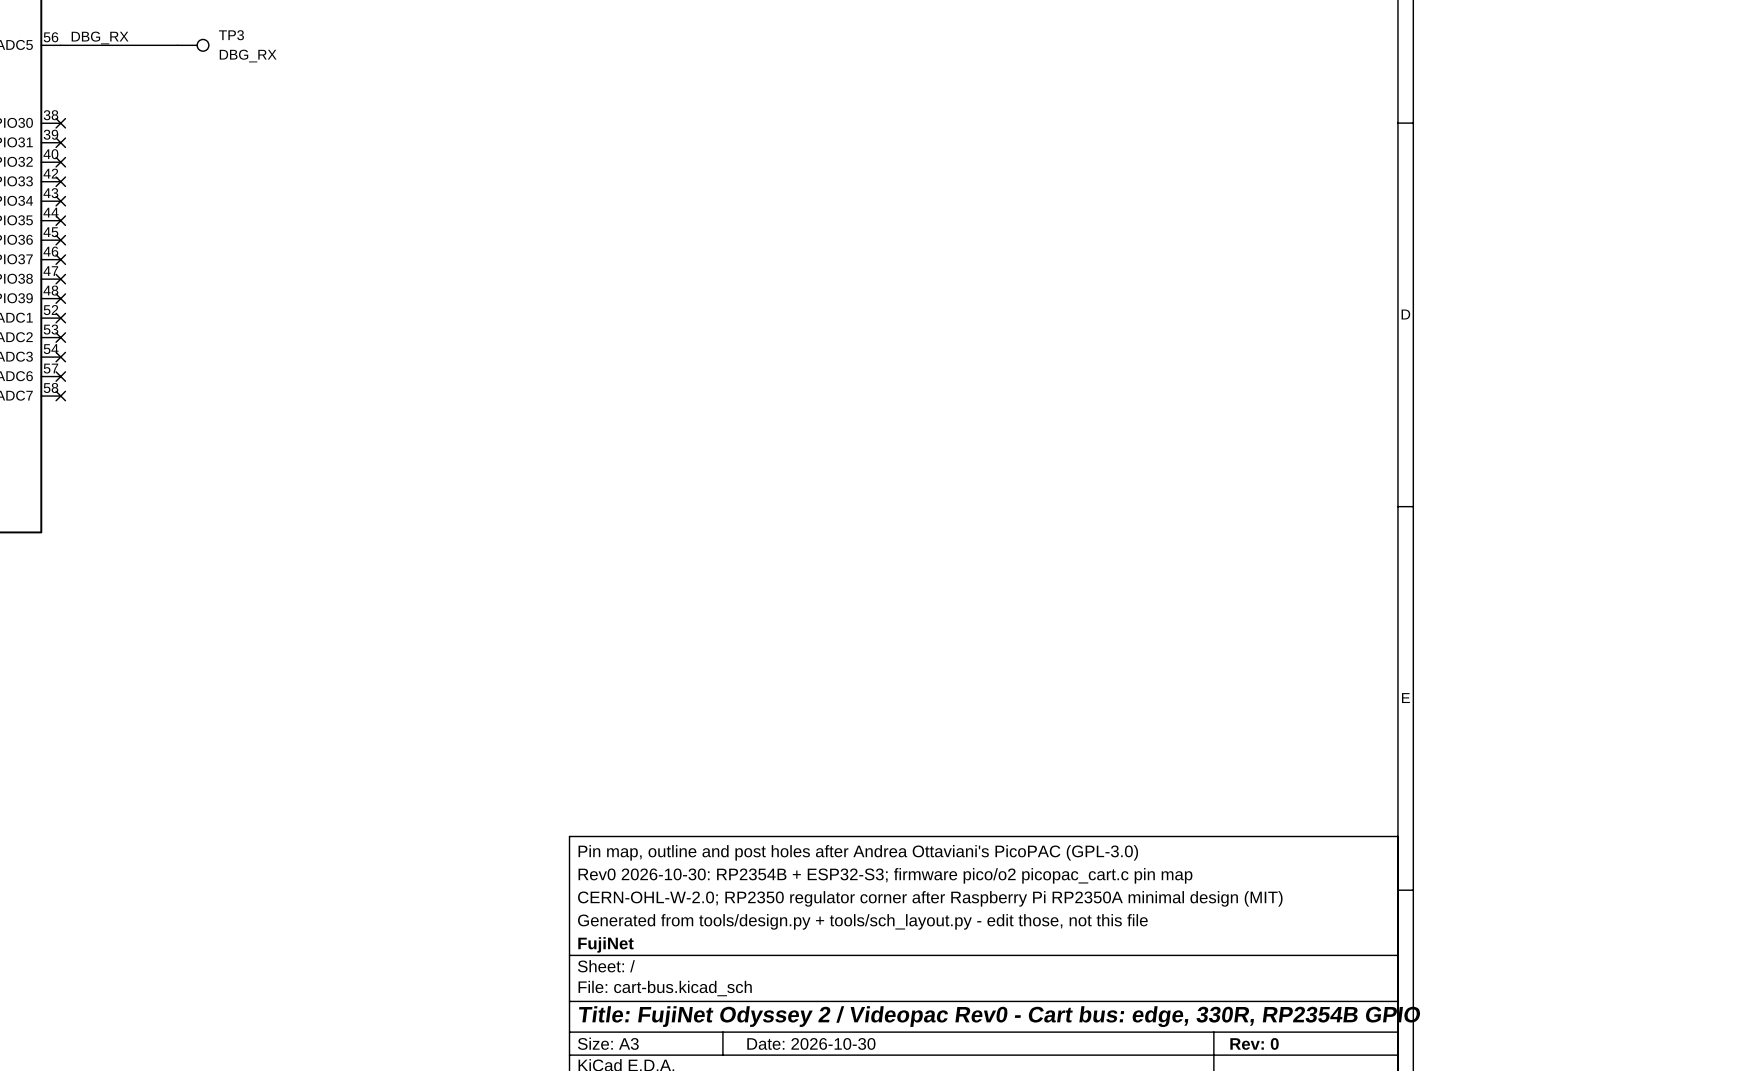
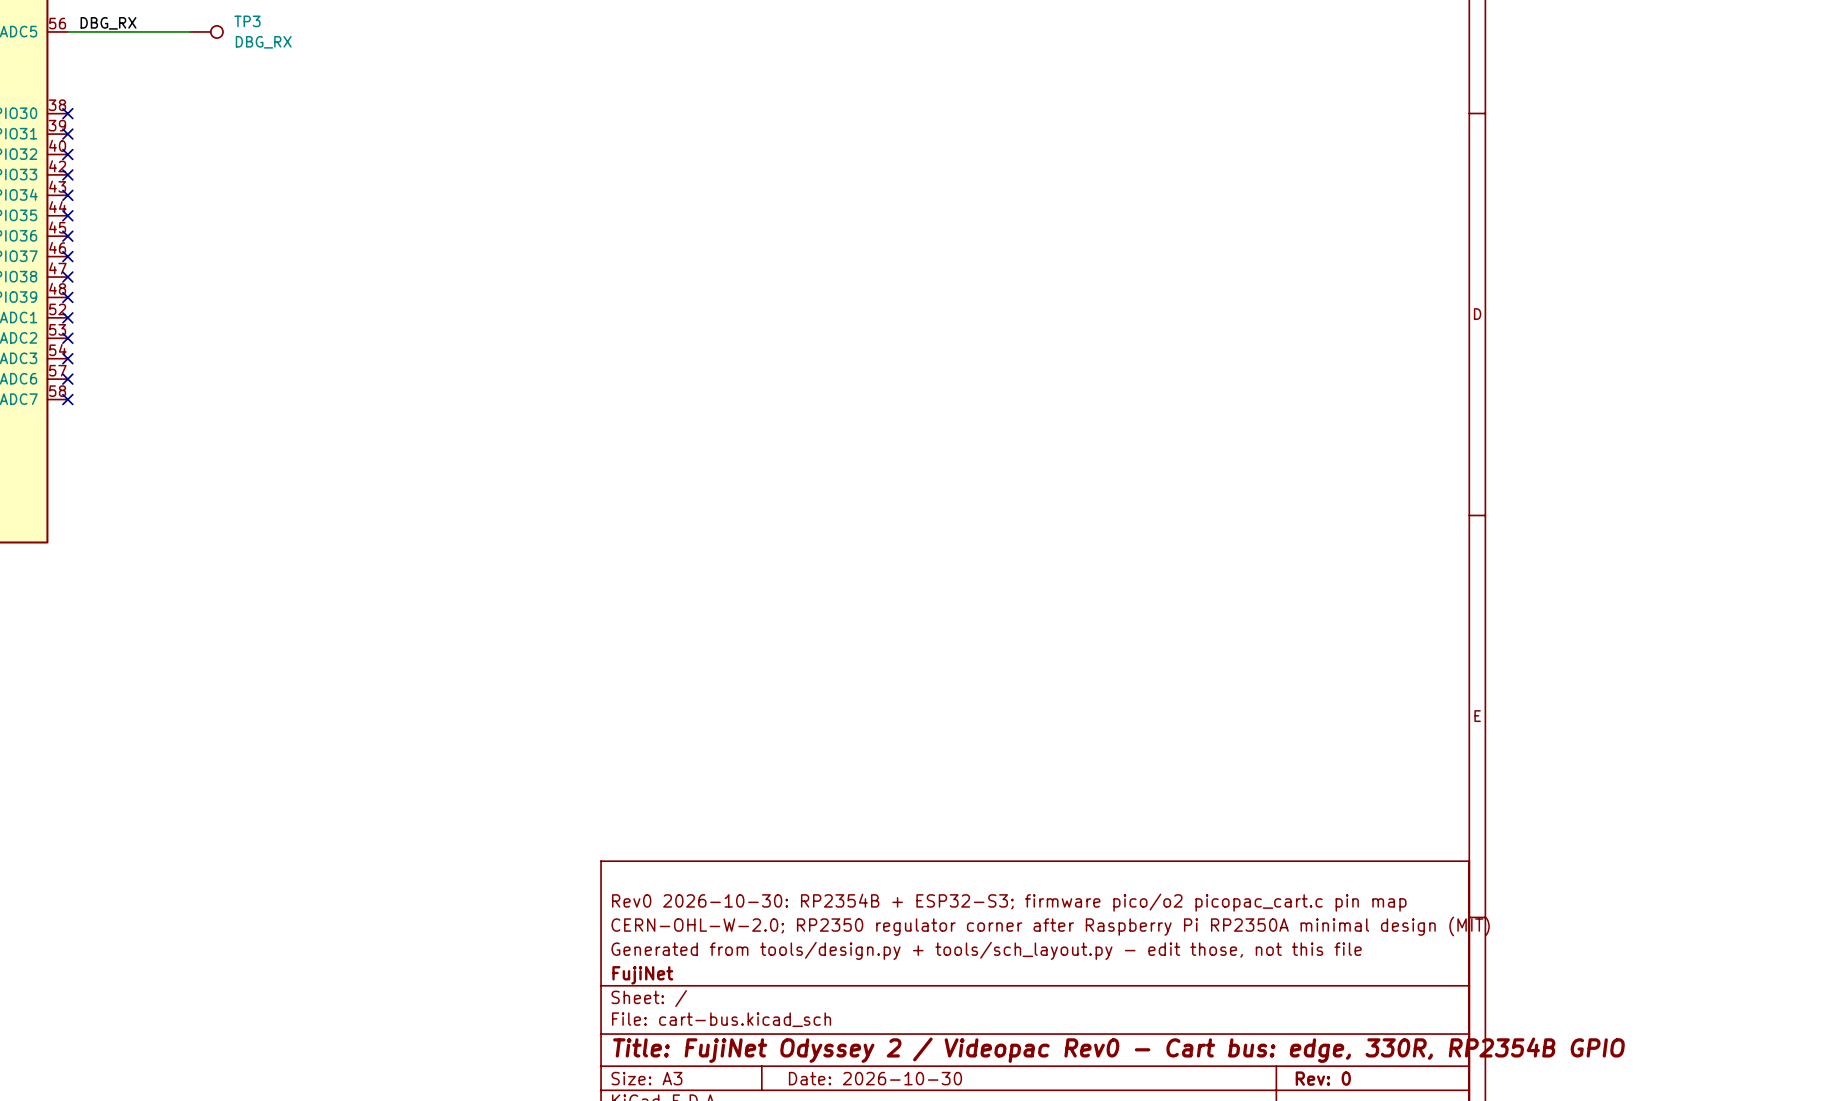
title block: Pin map, outline and post holes after Andrea Ottaviani's PicoPAC (GPL-3.0) (858, 852) -> none

